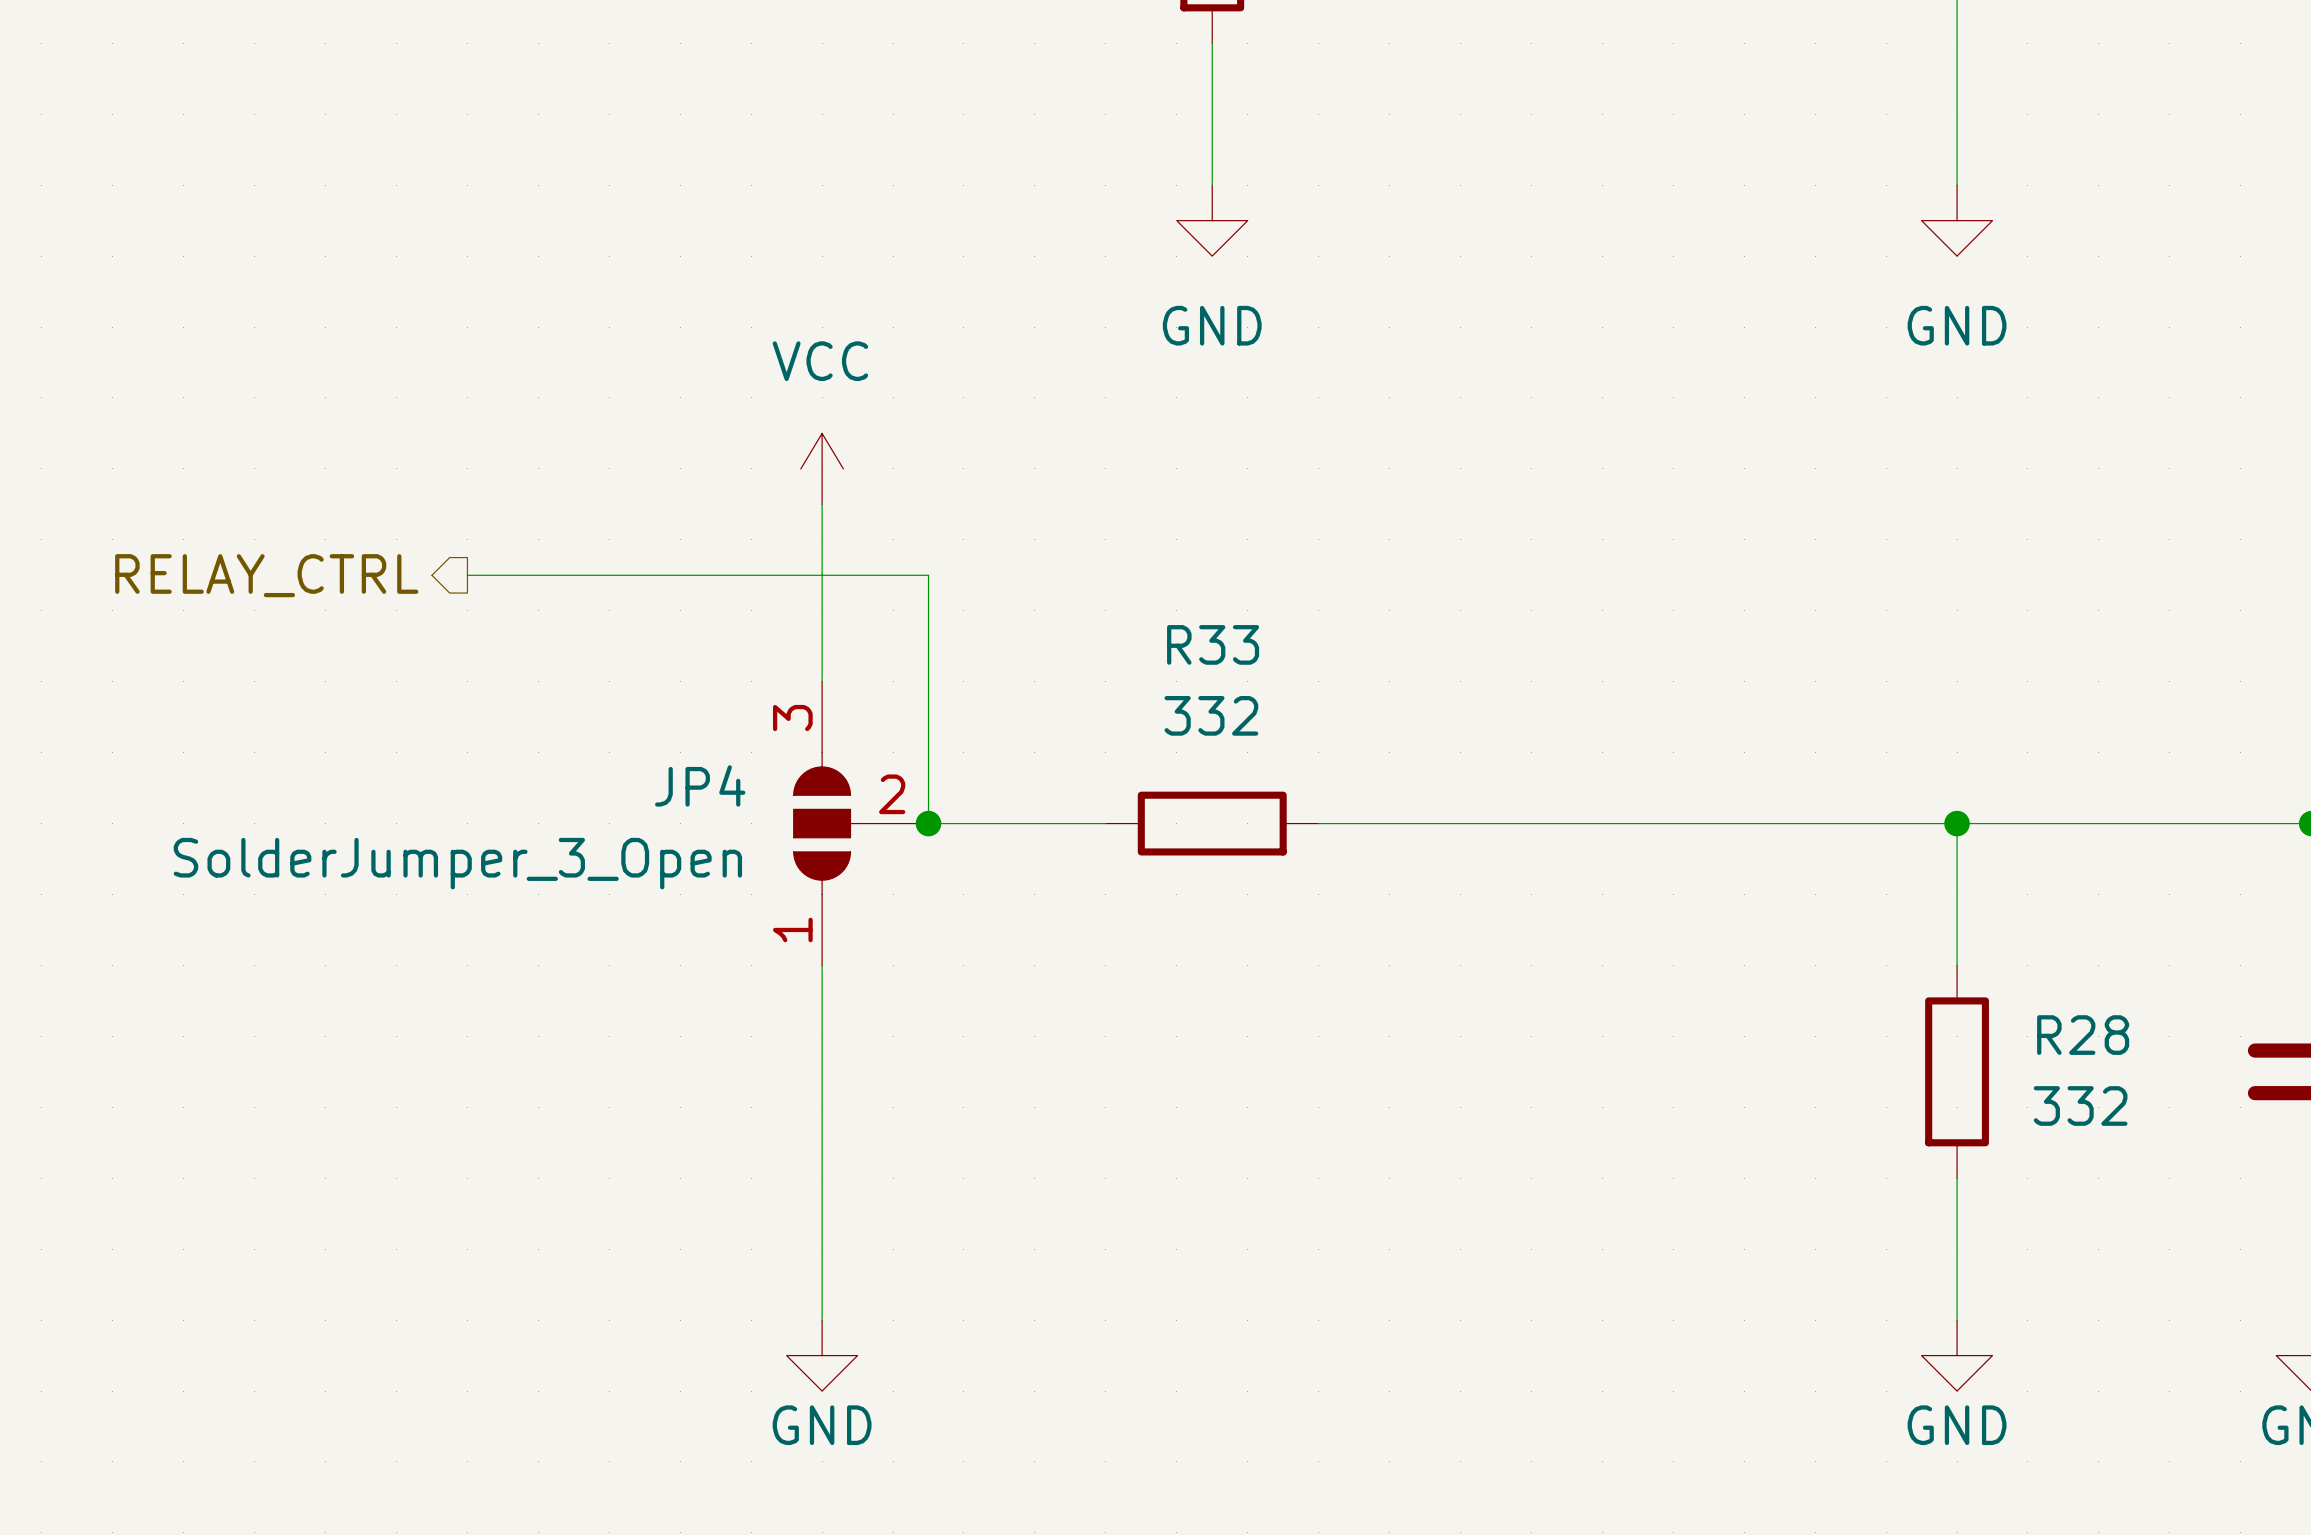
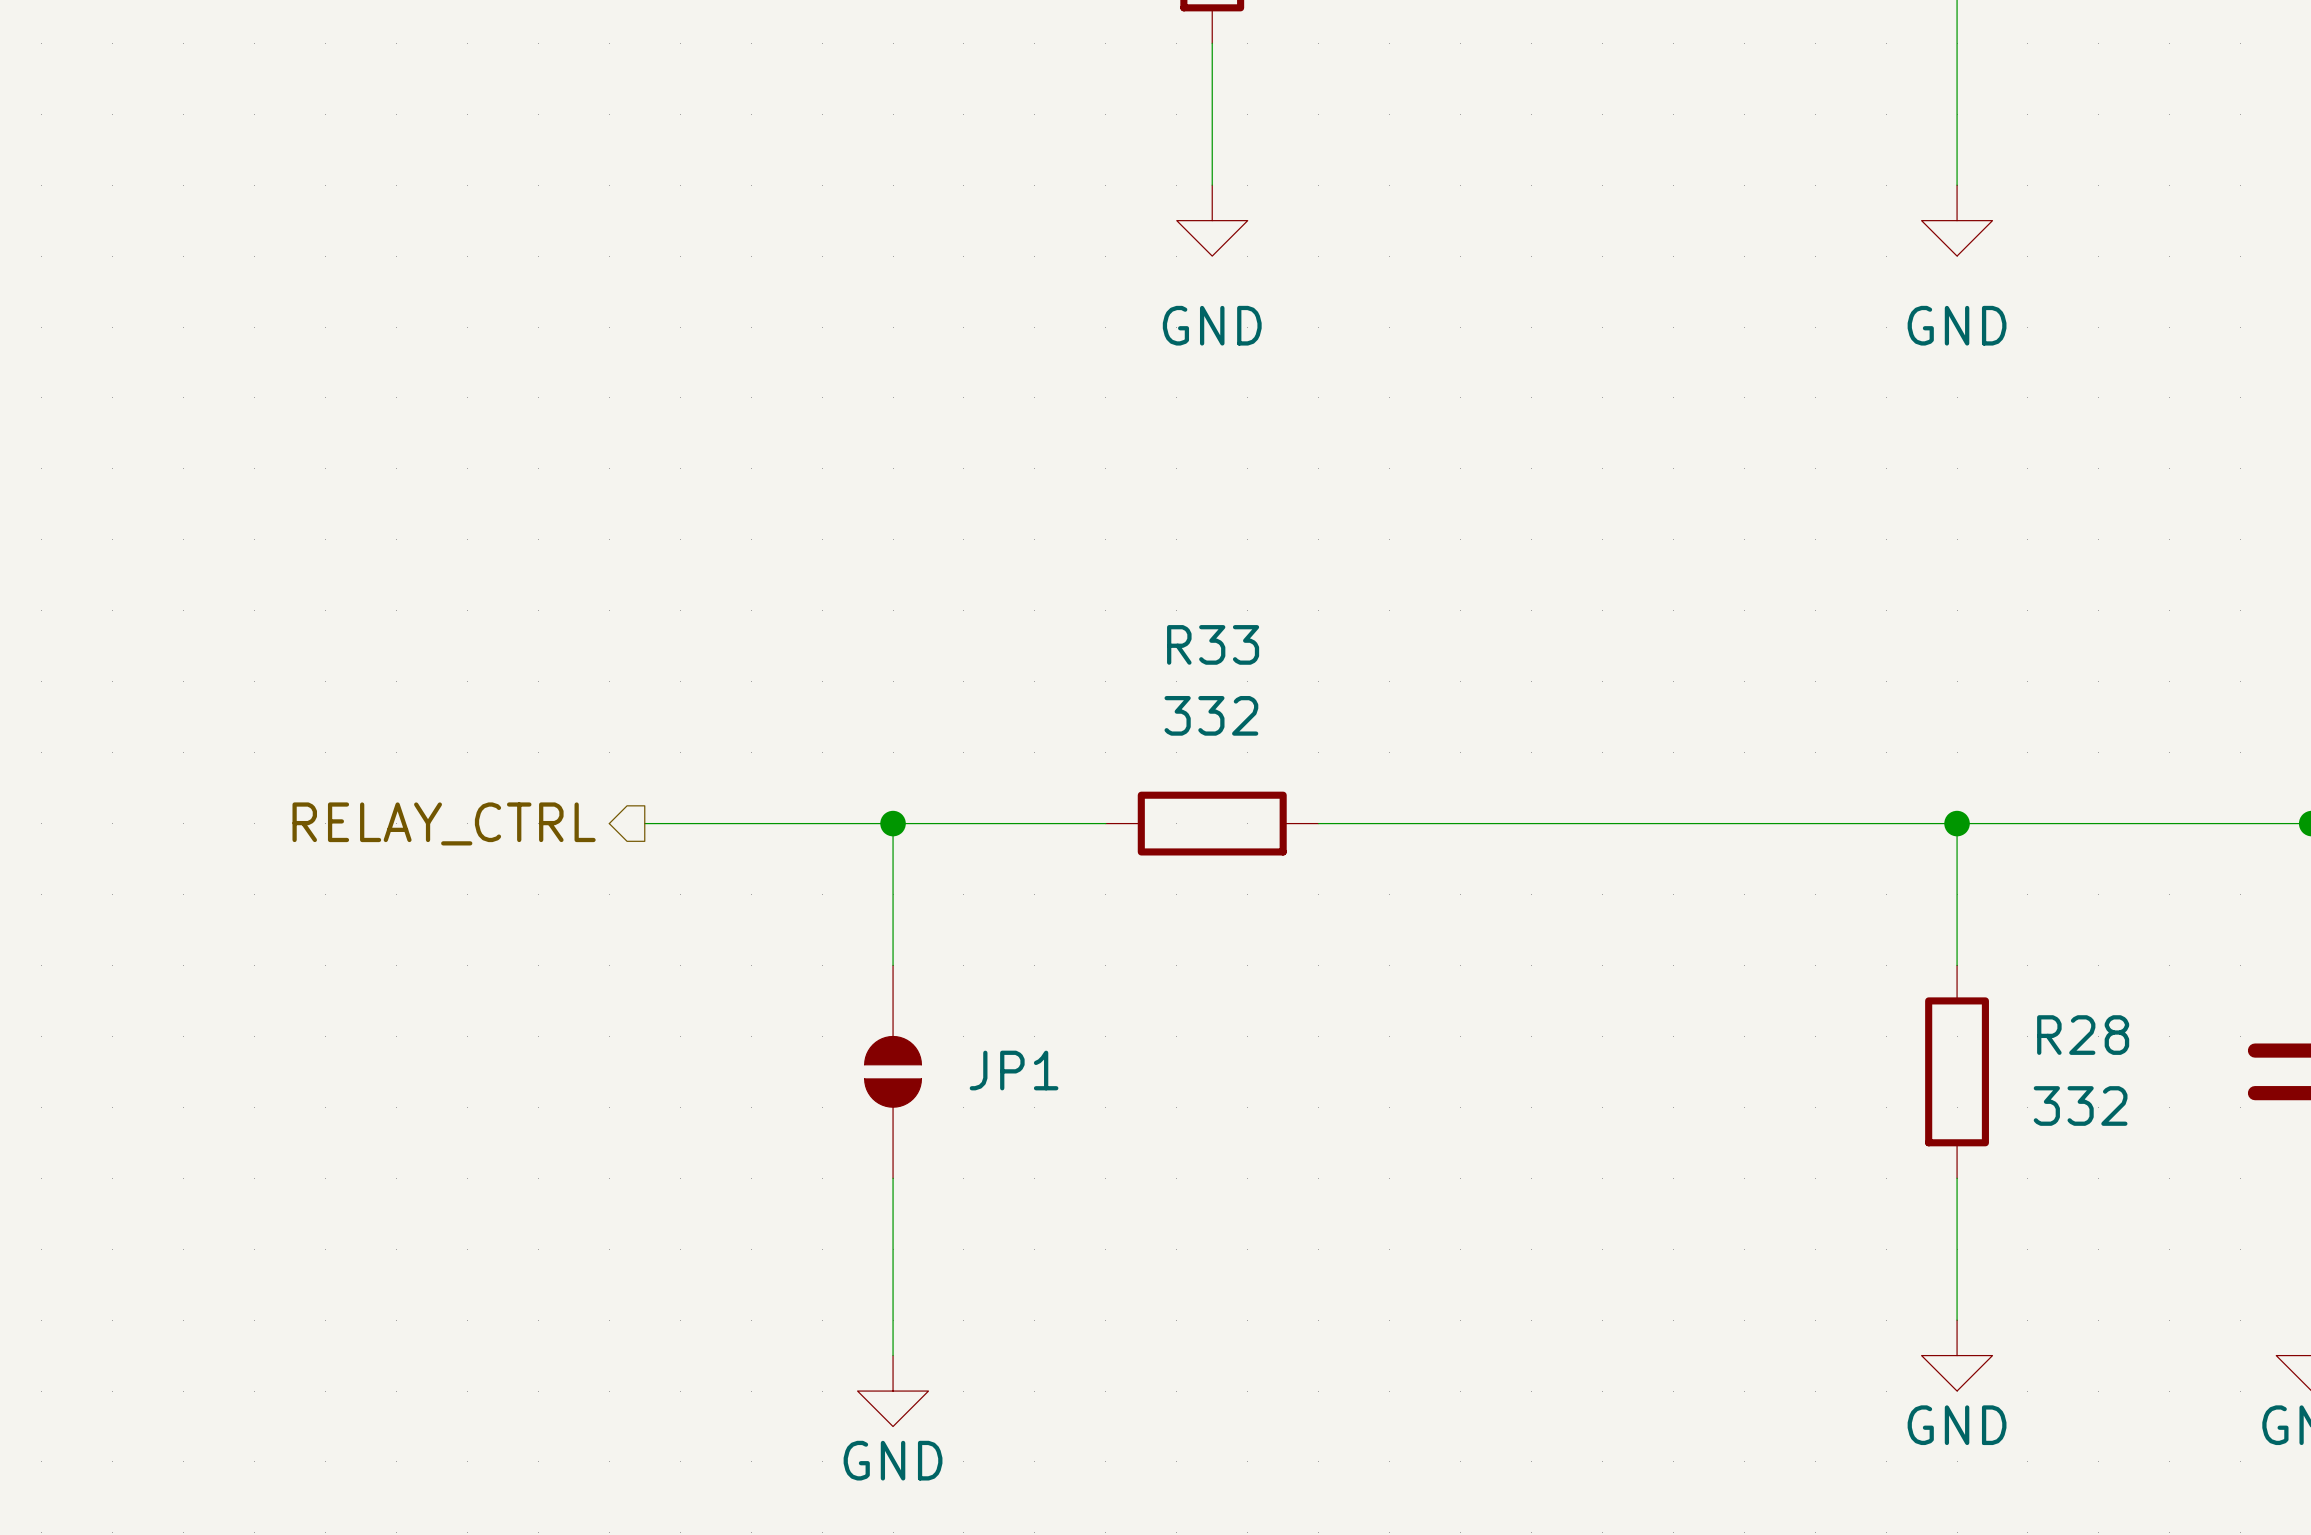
power symbol: VCC (822, 468) -> none
wire: (822, 504) (822, 681) -> (893, 1178) (893, 1355)
hierarchical label position: RELAY_CTRL (266, 575) -> RELAY_CTRL (444, 823)
wire: (467, 575) (928, 575) (928, 823) -> (644, 823) (928, 823)
JP4: SolderJumper_3_Open (861, 823) -> none
wire: none -> (893, 823) (893, 965)
junction position: (928, 823) -> (893, 823)
wire: (822, 965) (822, 1320) -> none
JP1: none -> (893, 1071)
power symbol position: GND (822, 1355) -> GND (893, 1391)

